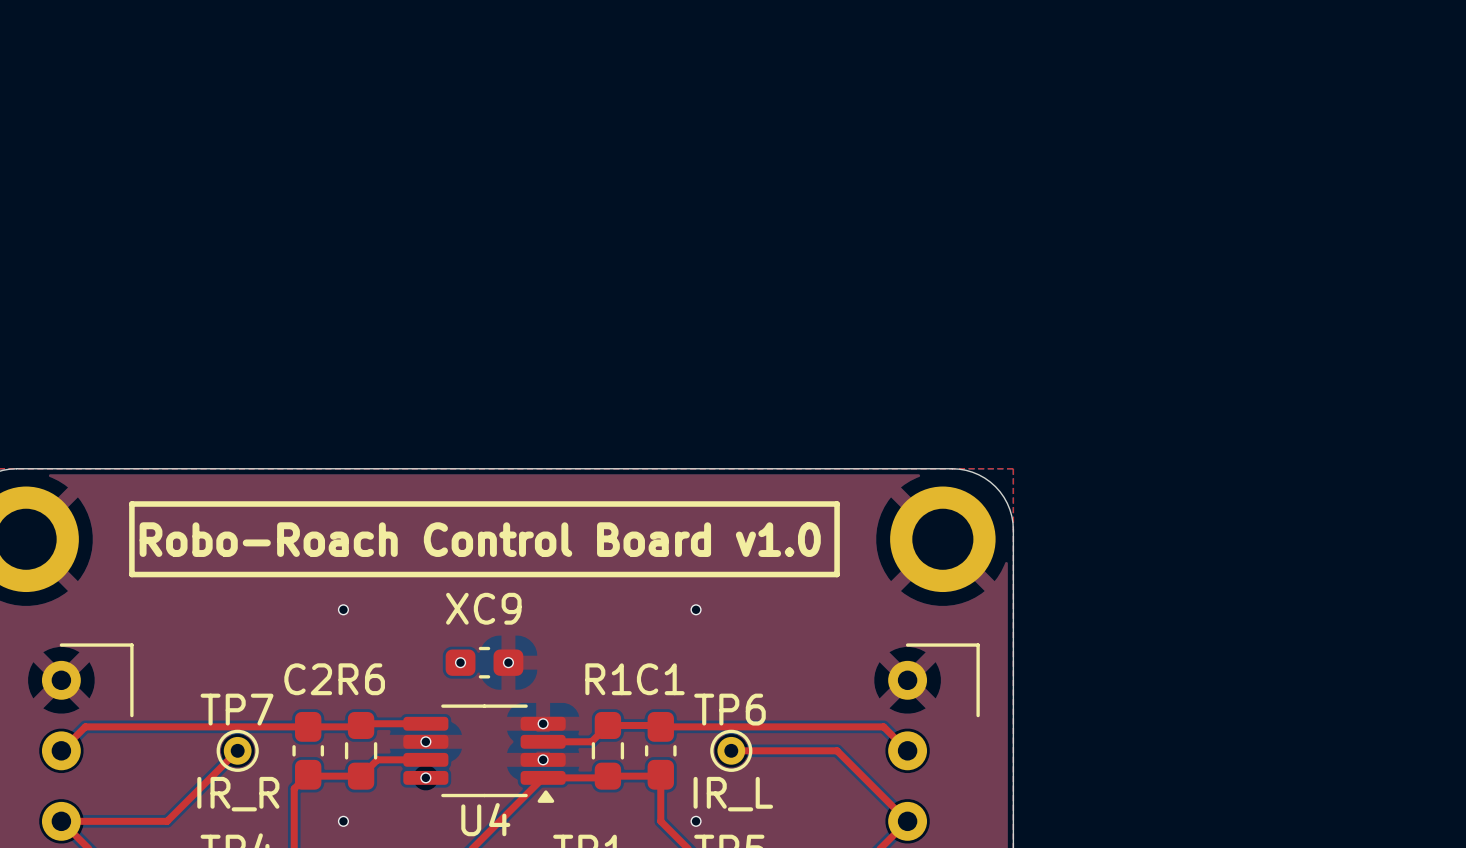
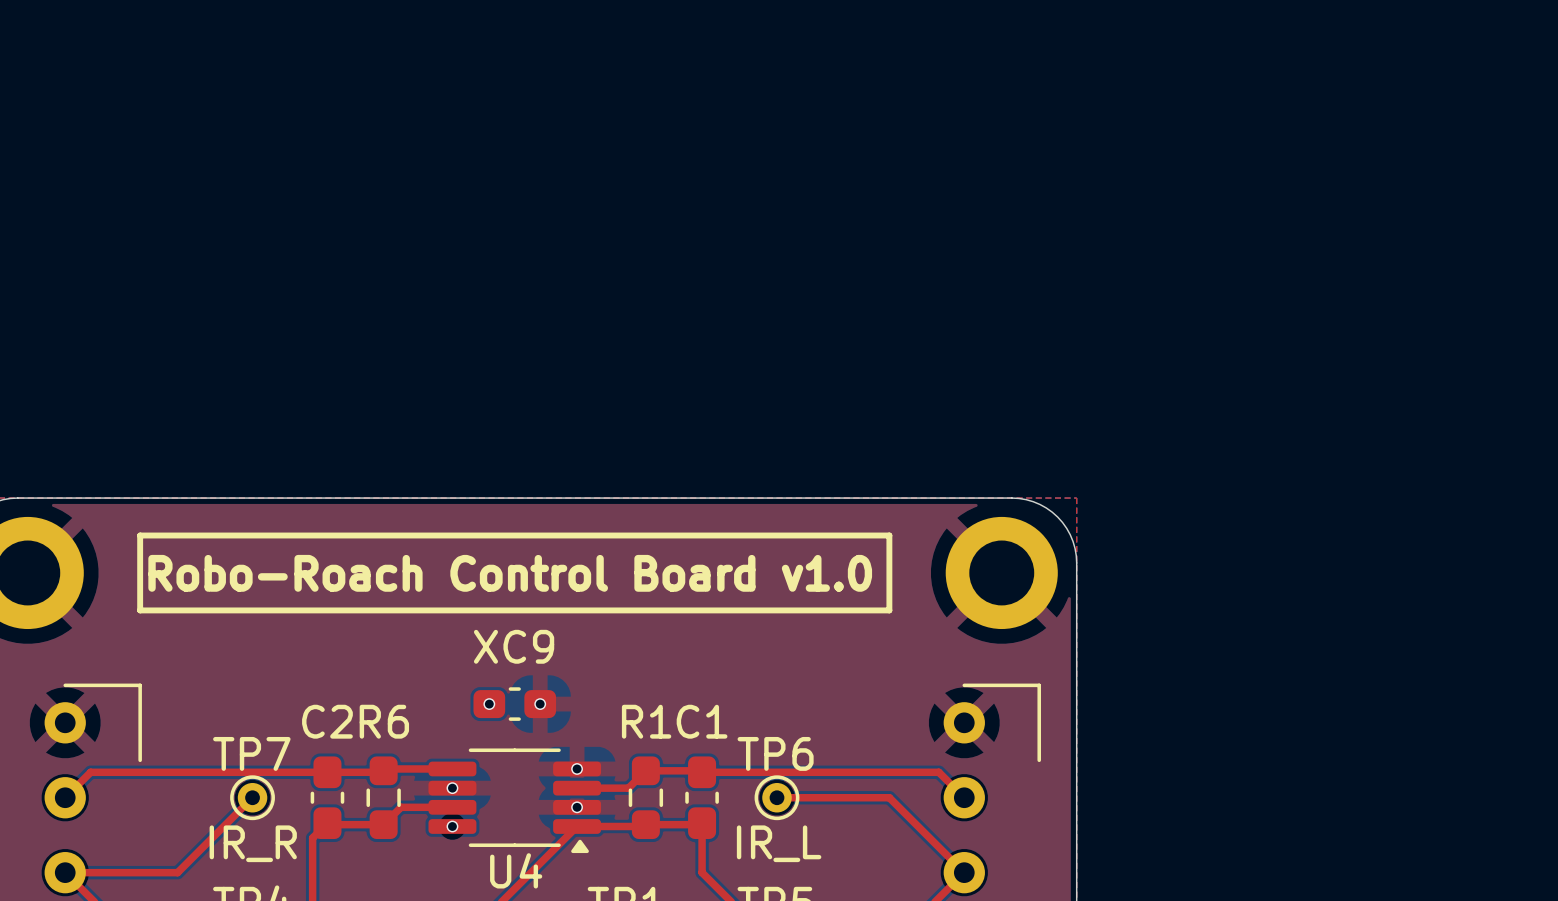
via: (343, 609) -> none
via: (696, 609) -> none
via: (343, 821) -> none
via: (696, 821) -> none

